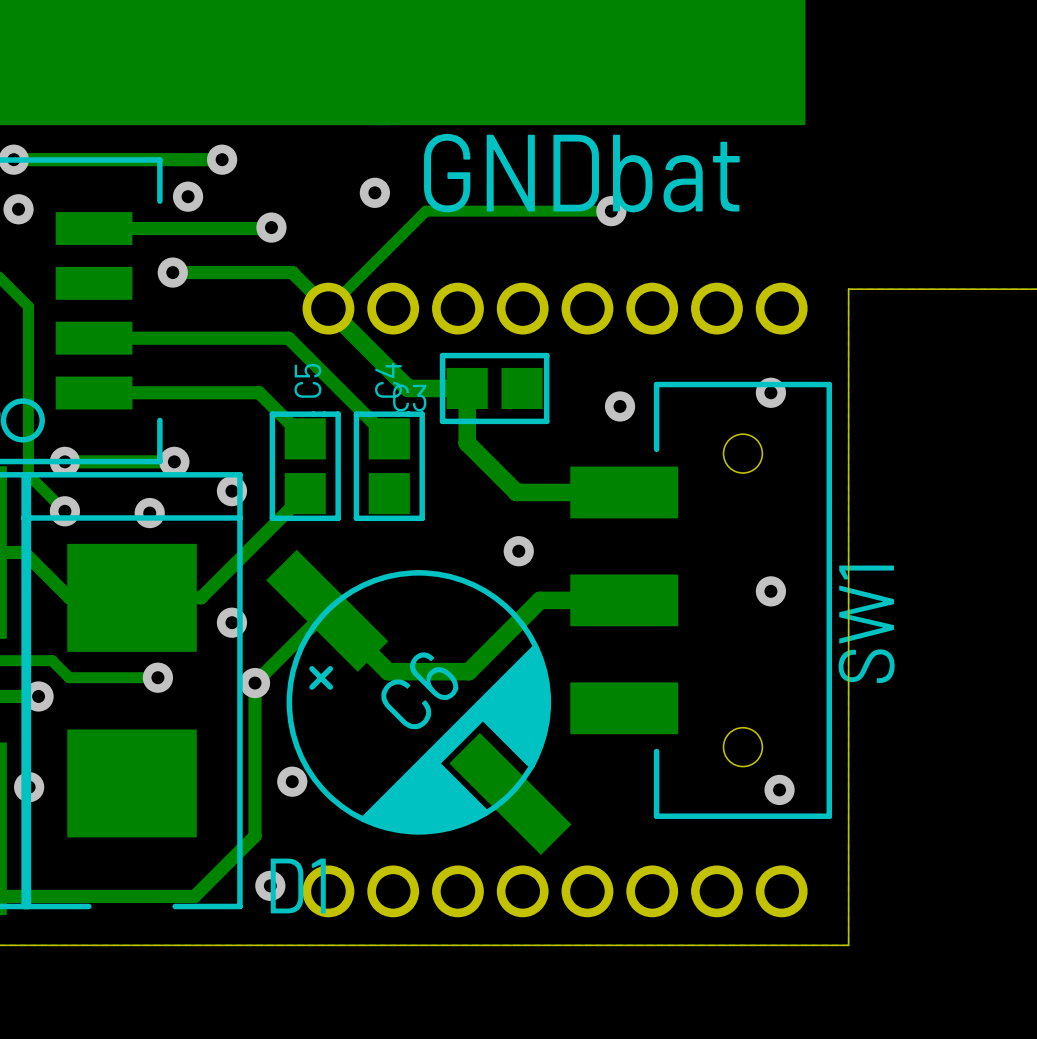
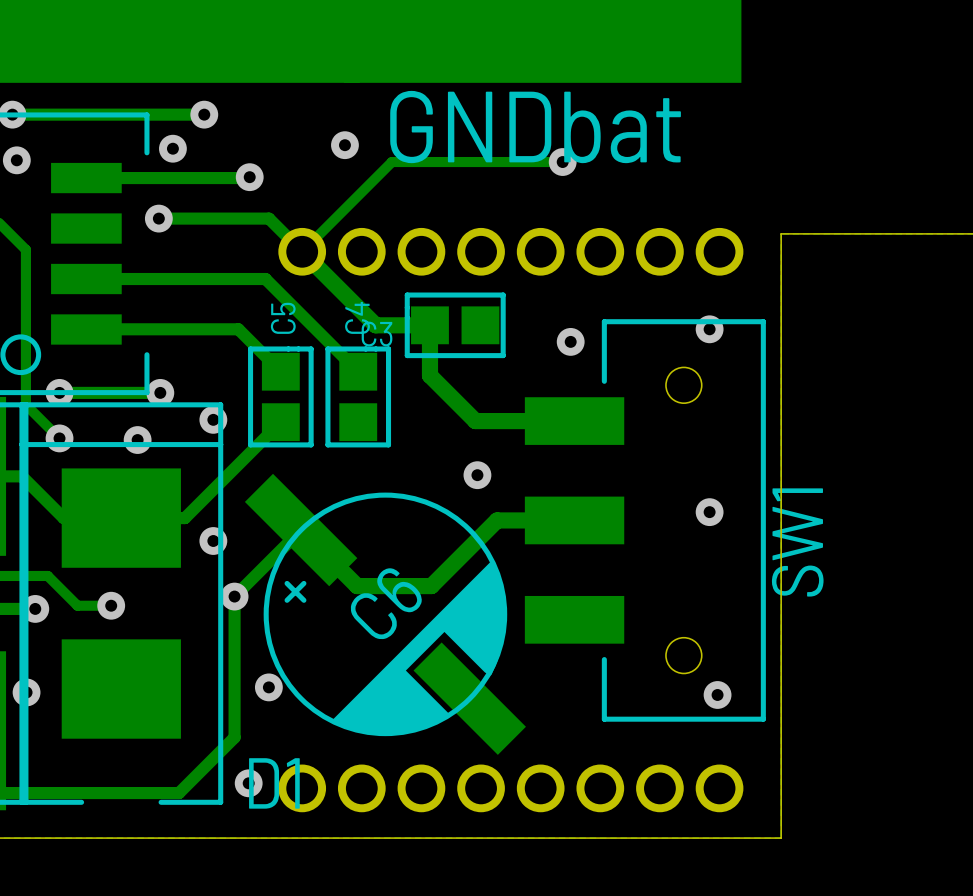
track: (157, 677) (69, 677) -> (111, 605) (77, 605) (63, 591)
via position: (157, 677) -> (111, 605)

